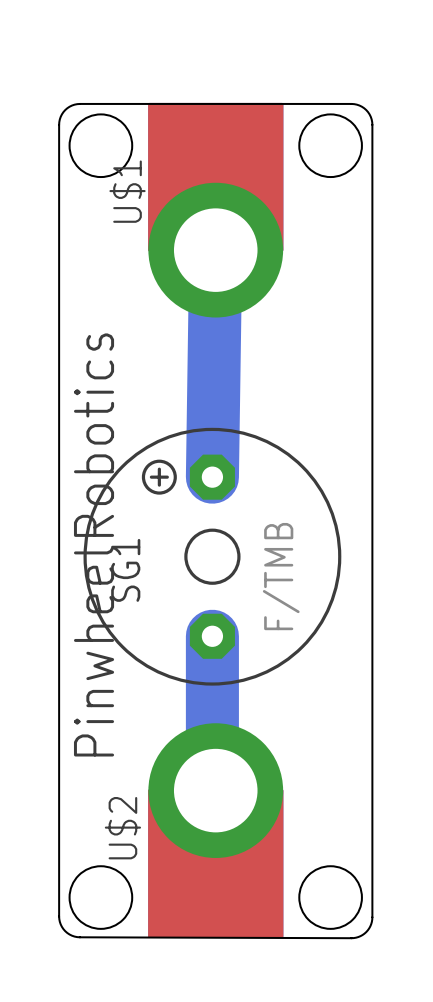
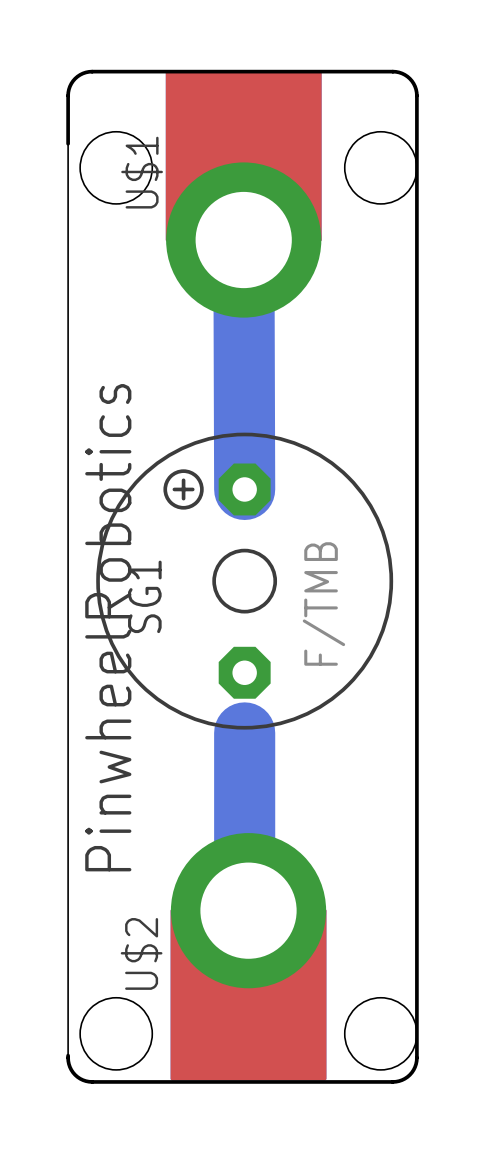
board edge: (59, 124) (60, 116) (65, 110) (72, 105) (80, 103) (351, 103) (364, 108) (370, 116) (372, 124) (372, 917) (370, 926) (366, 932) (358, 937) (351, 938) (77, 937) (65, 931) (60, 924) (59, 916) -> (68, 143) (68, 89) (77, 76) (89, 71) (392, 71) (407, 76) (413, 83) (416, 92) (416, 1057) (415, 1067) (407, 1076) (392, 1081) (92, 1081) (82, 1080) (75, 1074) (69, 1067) (68, 1055)
bottom track: none -> (243, 240) (244, 489)
U$1 position: (215, 210) -> (243, 194)
bottom track: (215, 250) (212, 477) -> none
SG1 position: (212, 556) -> (244, 581)

